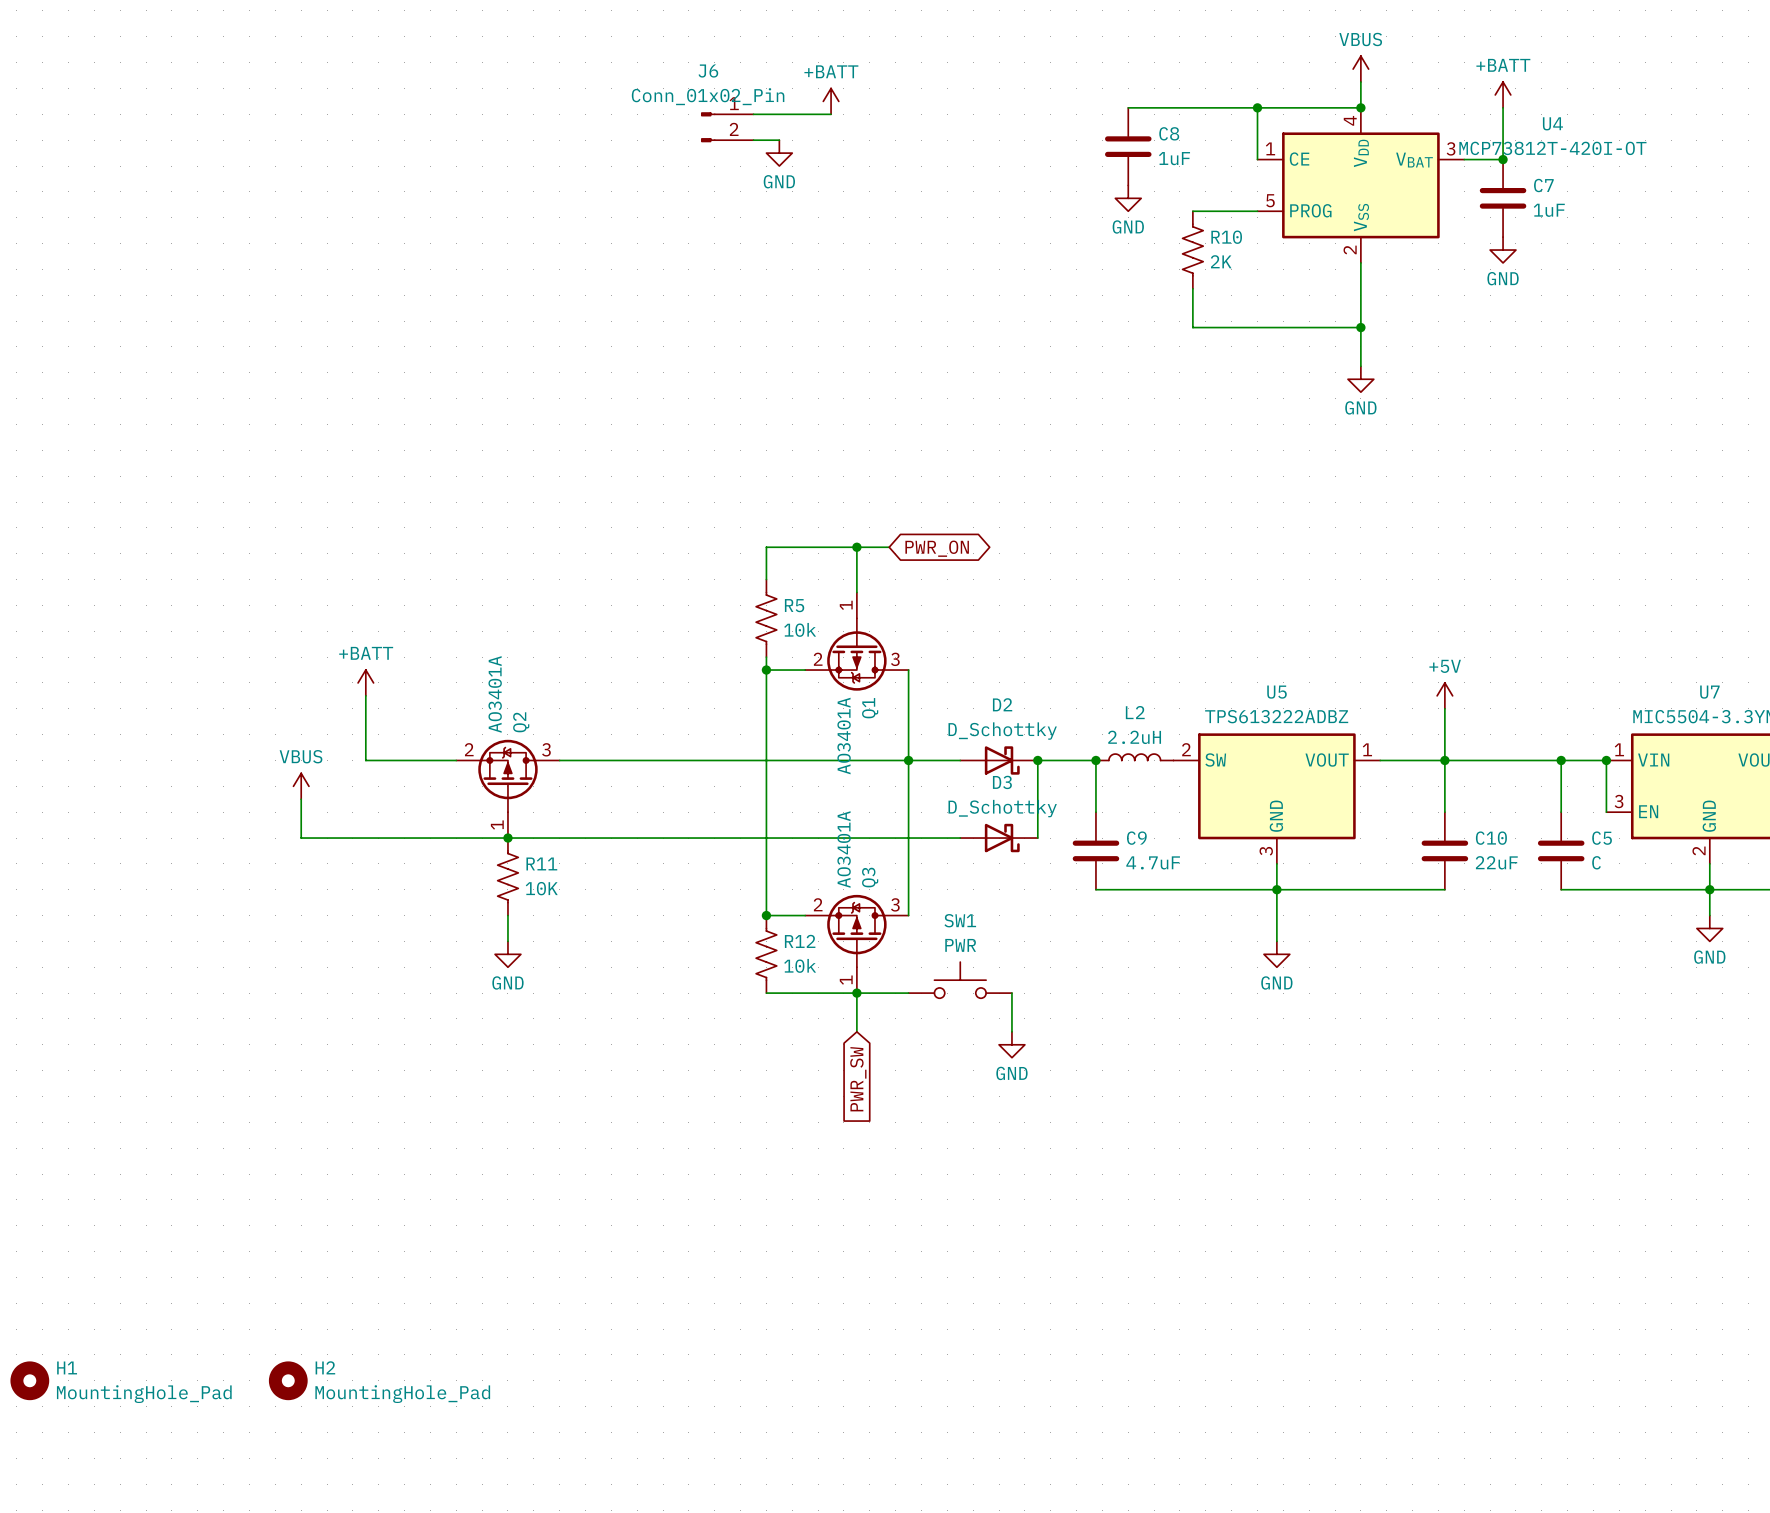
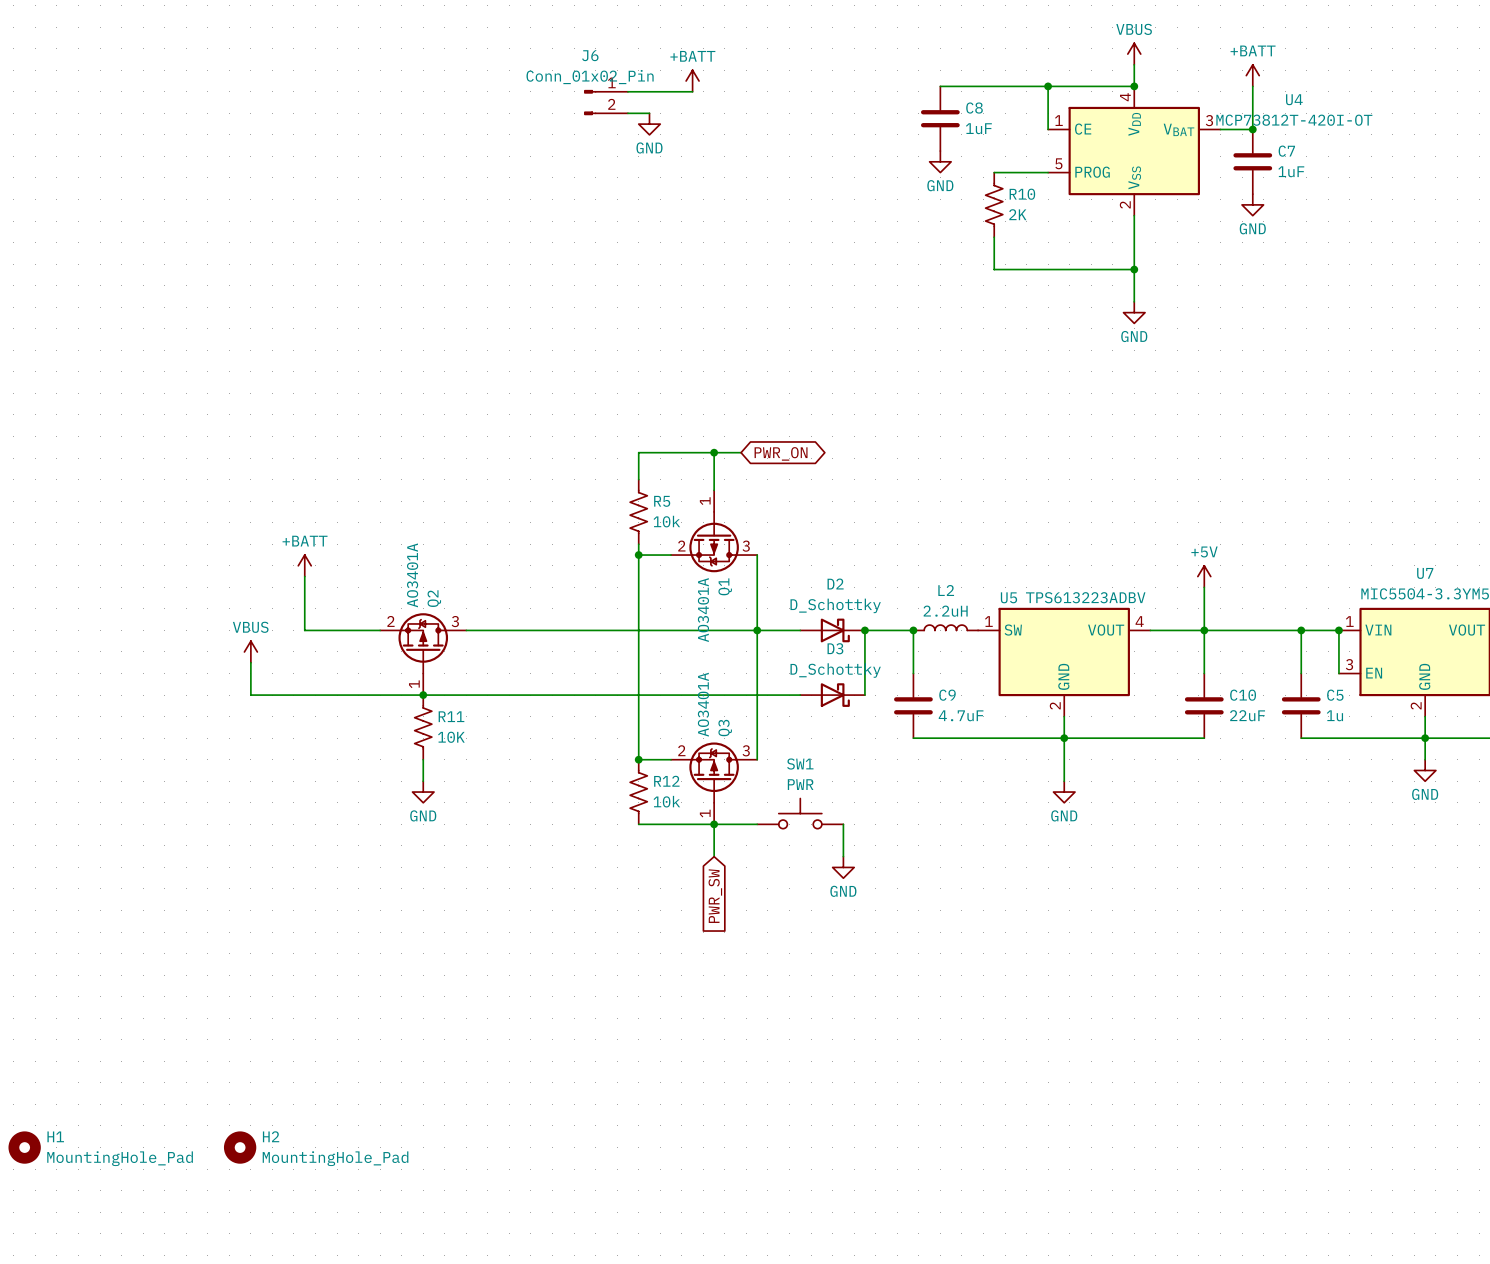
U5 name position: U5 (1277, 692) -> U5 (1008, 597)
U5 value: TPS613222ADBZ (1276, 716) -> TPS613223ADBV (1085, 597)
U5 pin number: 2 (1186, 749) -> 1 (988, 621)
U5 pin number: 1 (1367, 749) -> 4 (1139, 621)
U5 pin number: 3 (1266, 851) -> 2 (1055, 705)
C5 value: C (1596, 862) -> 1u (1334, 715)

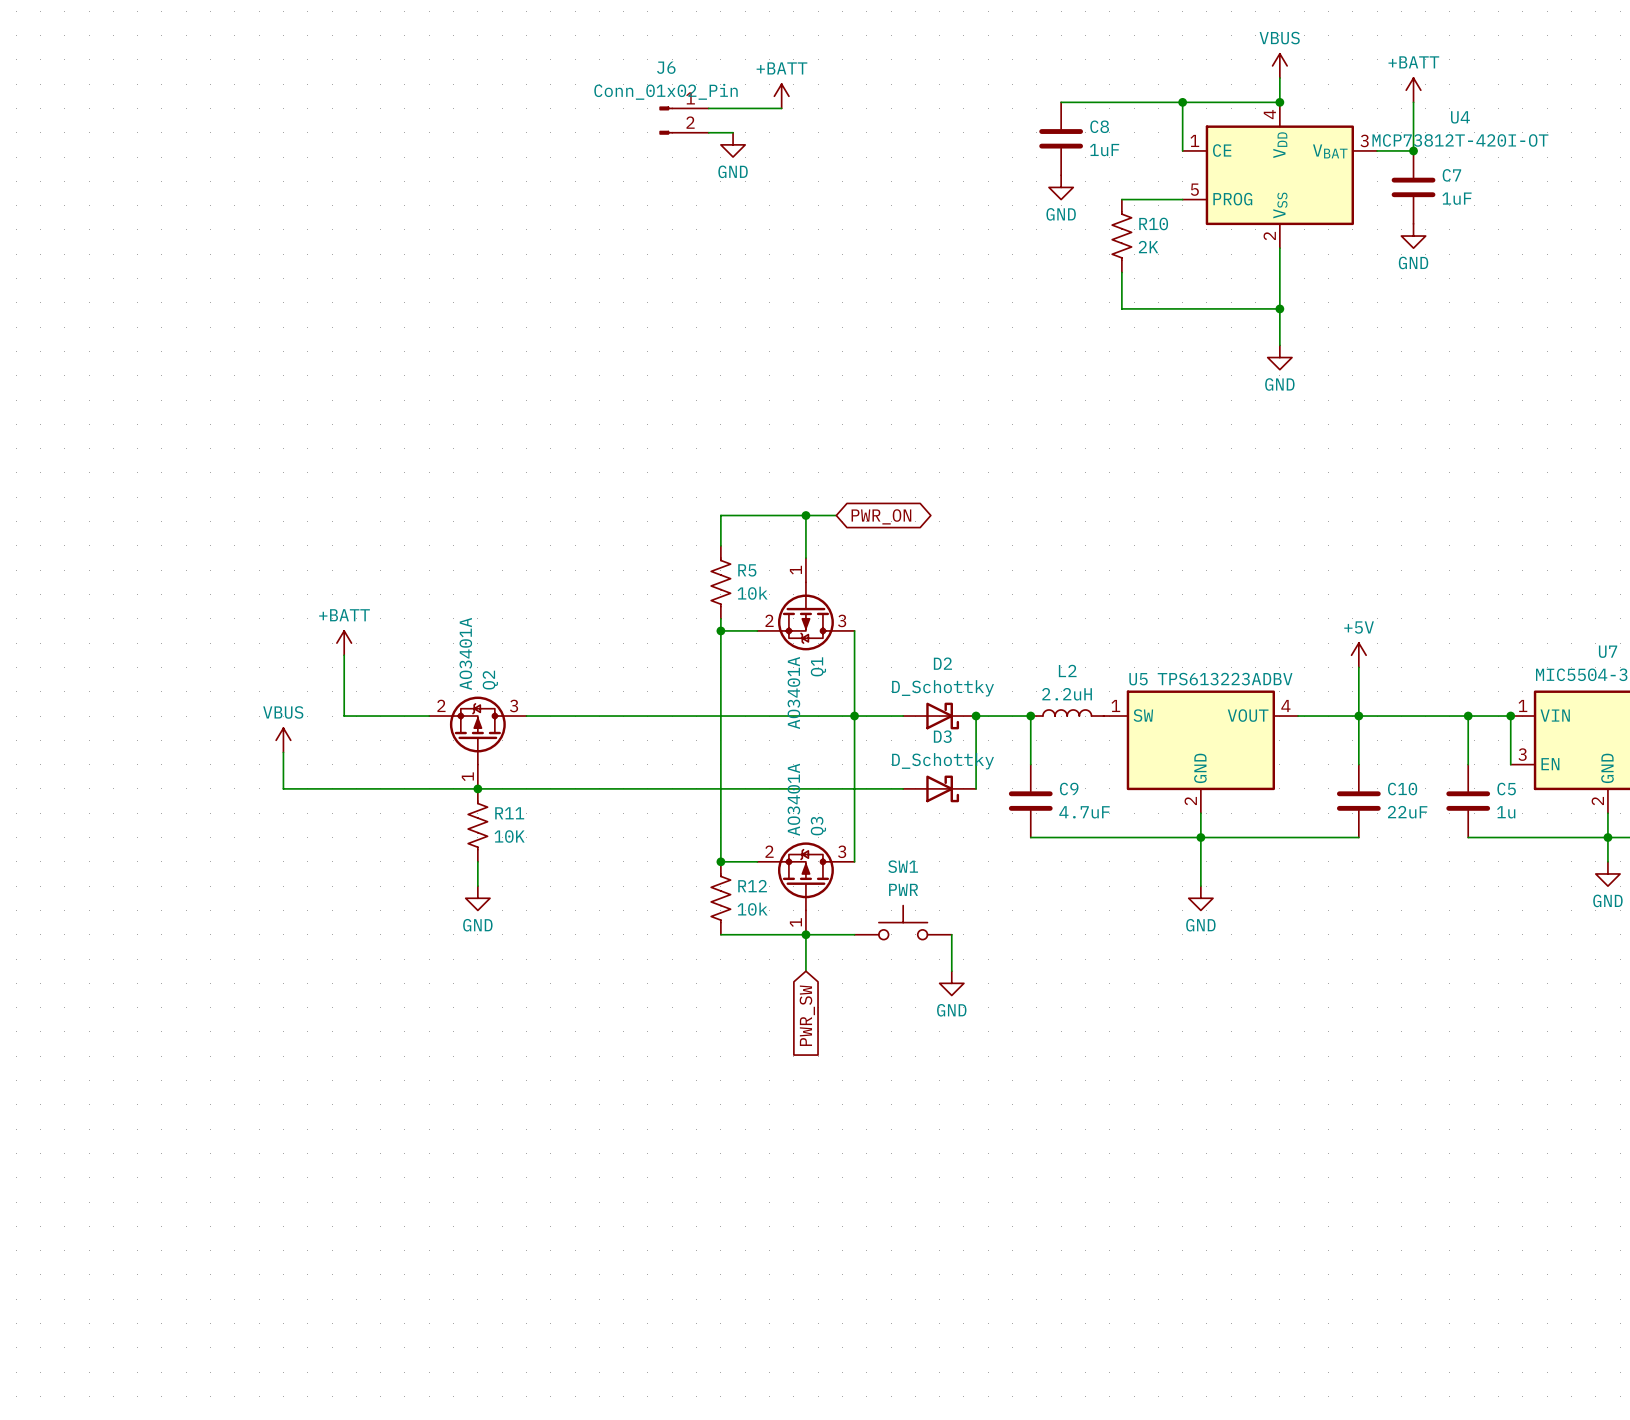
H1: MountingHole_Pad (24, 1147) -> none
H2: MountingHole_Pad (240, 1147) -> none

